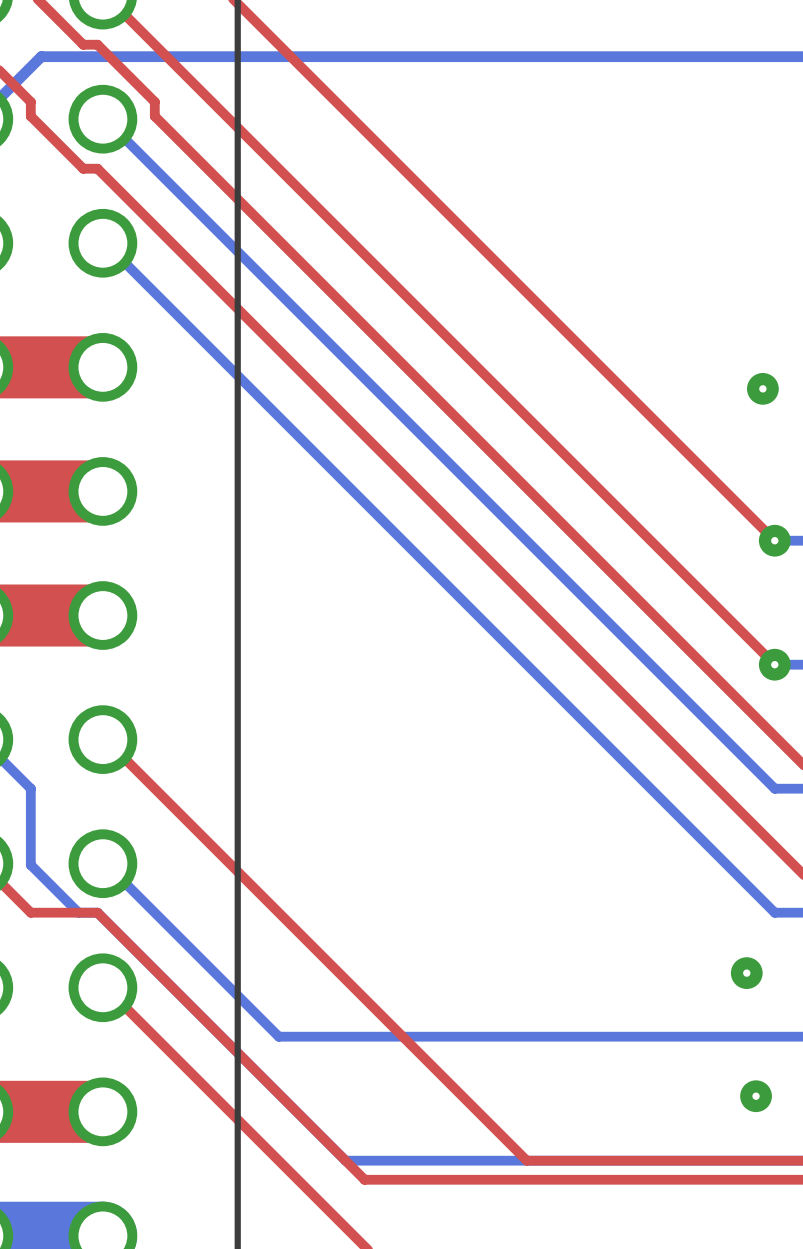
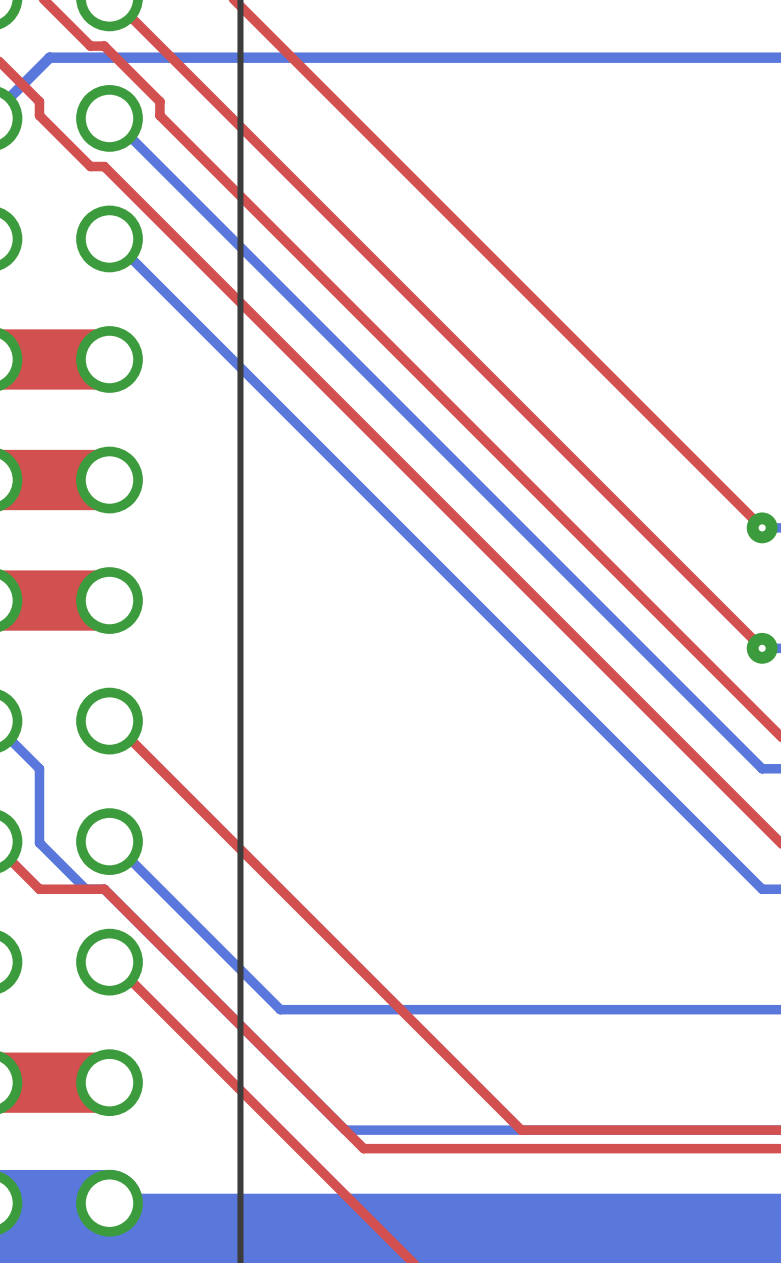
via: (762, 388) -> none
via: (746, 973) -> none
via: (756, 1096) -> none

